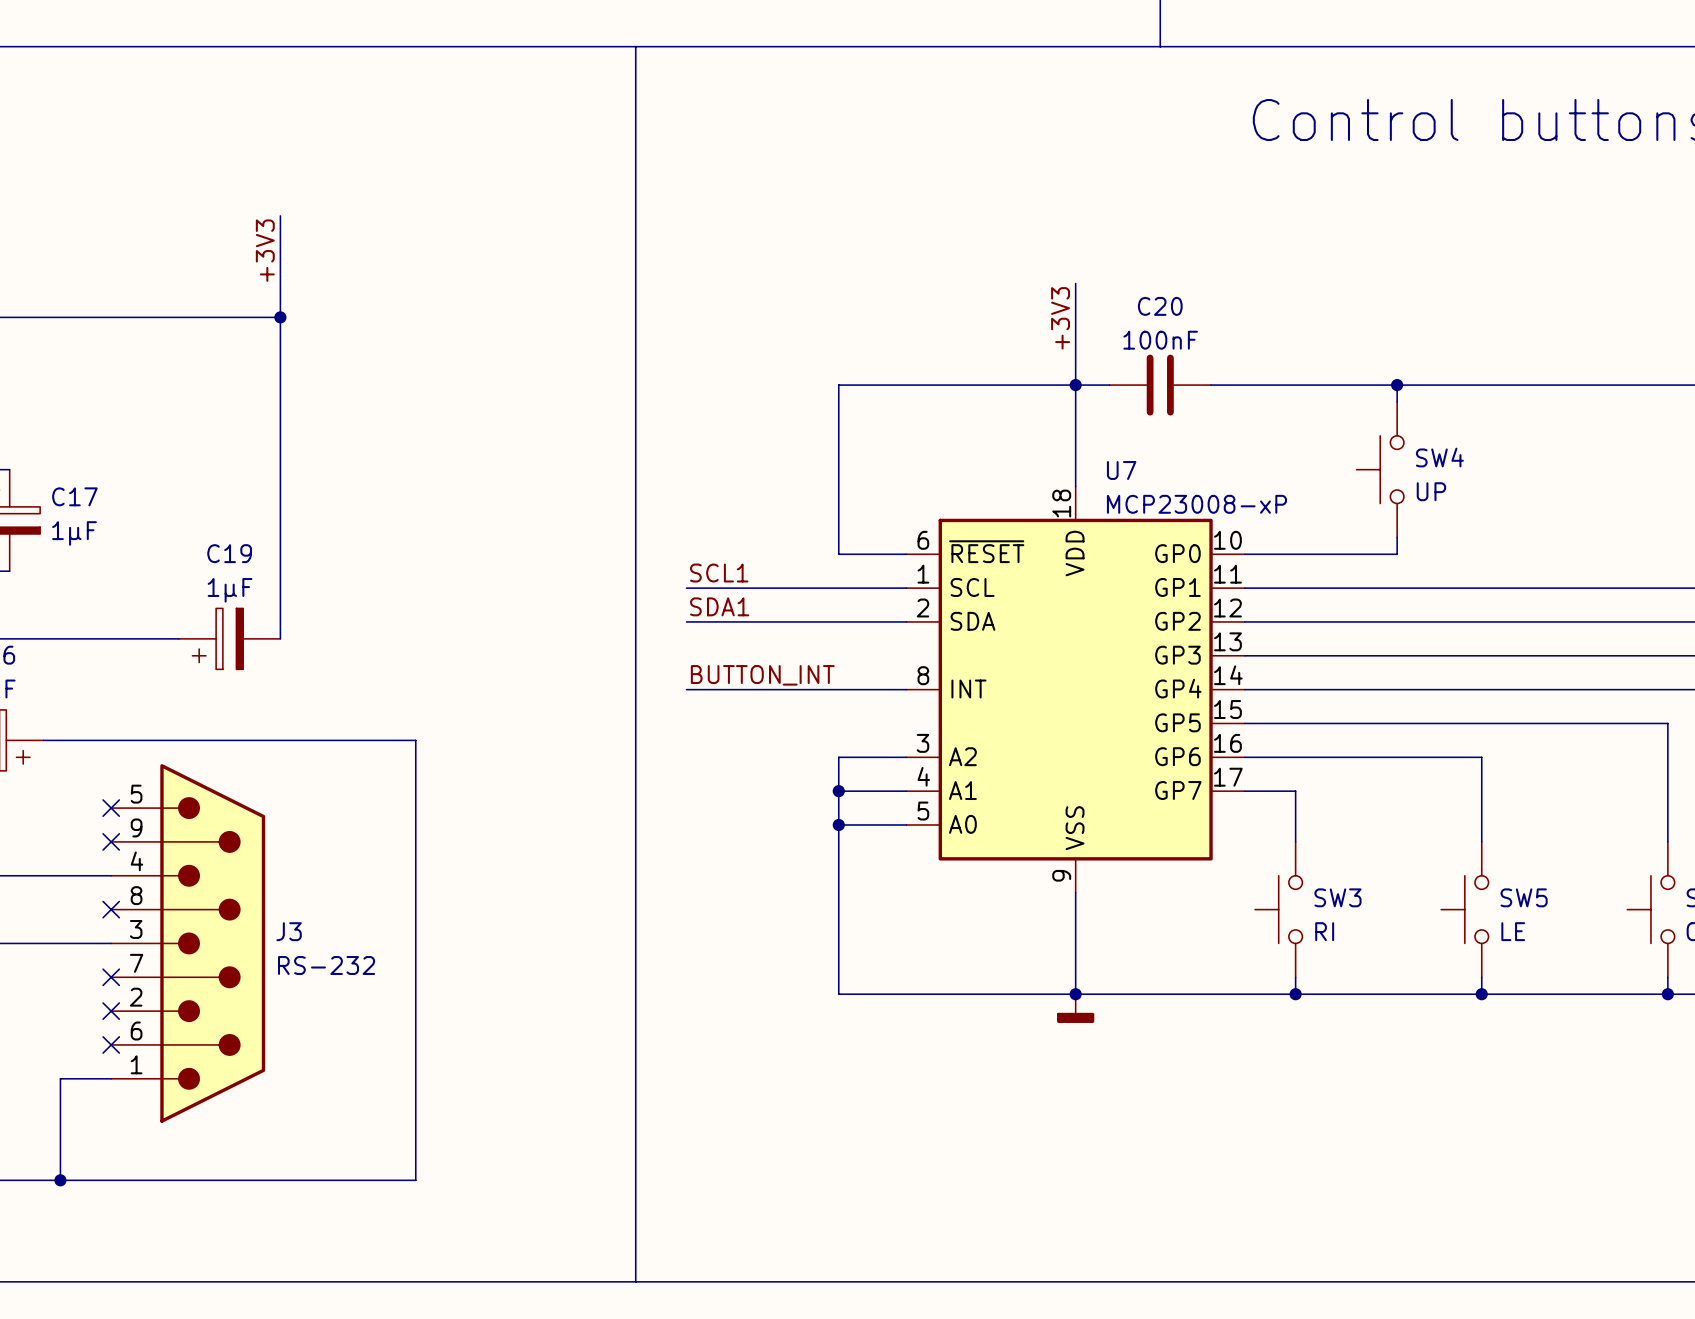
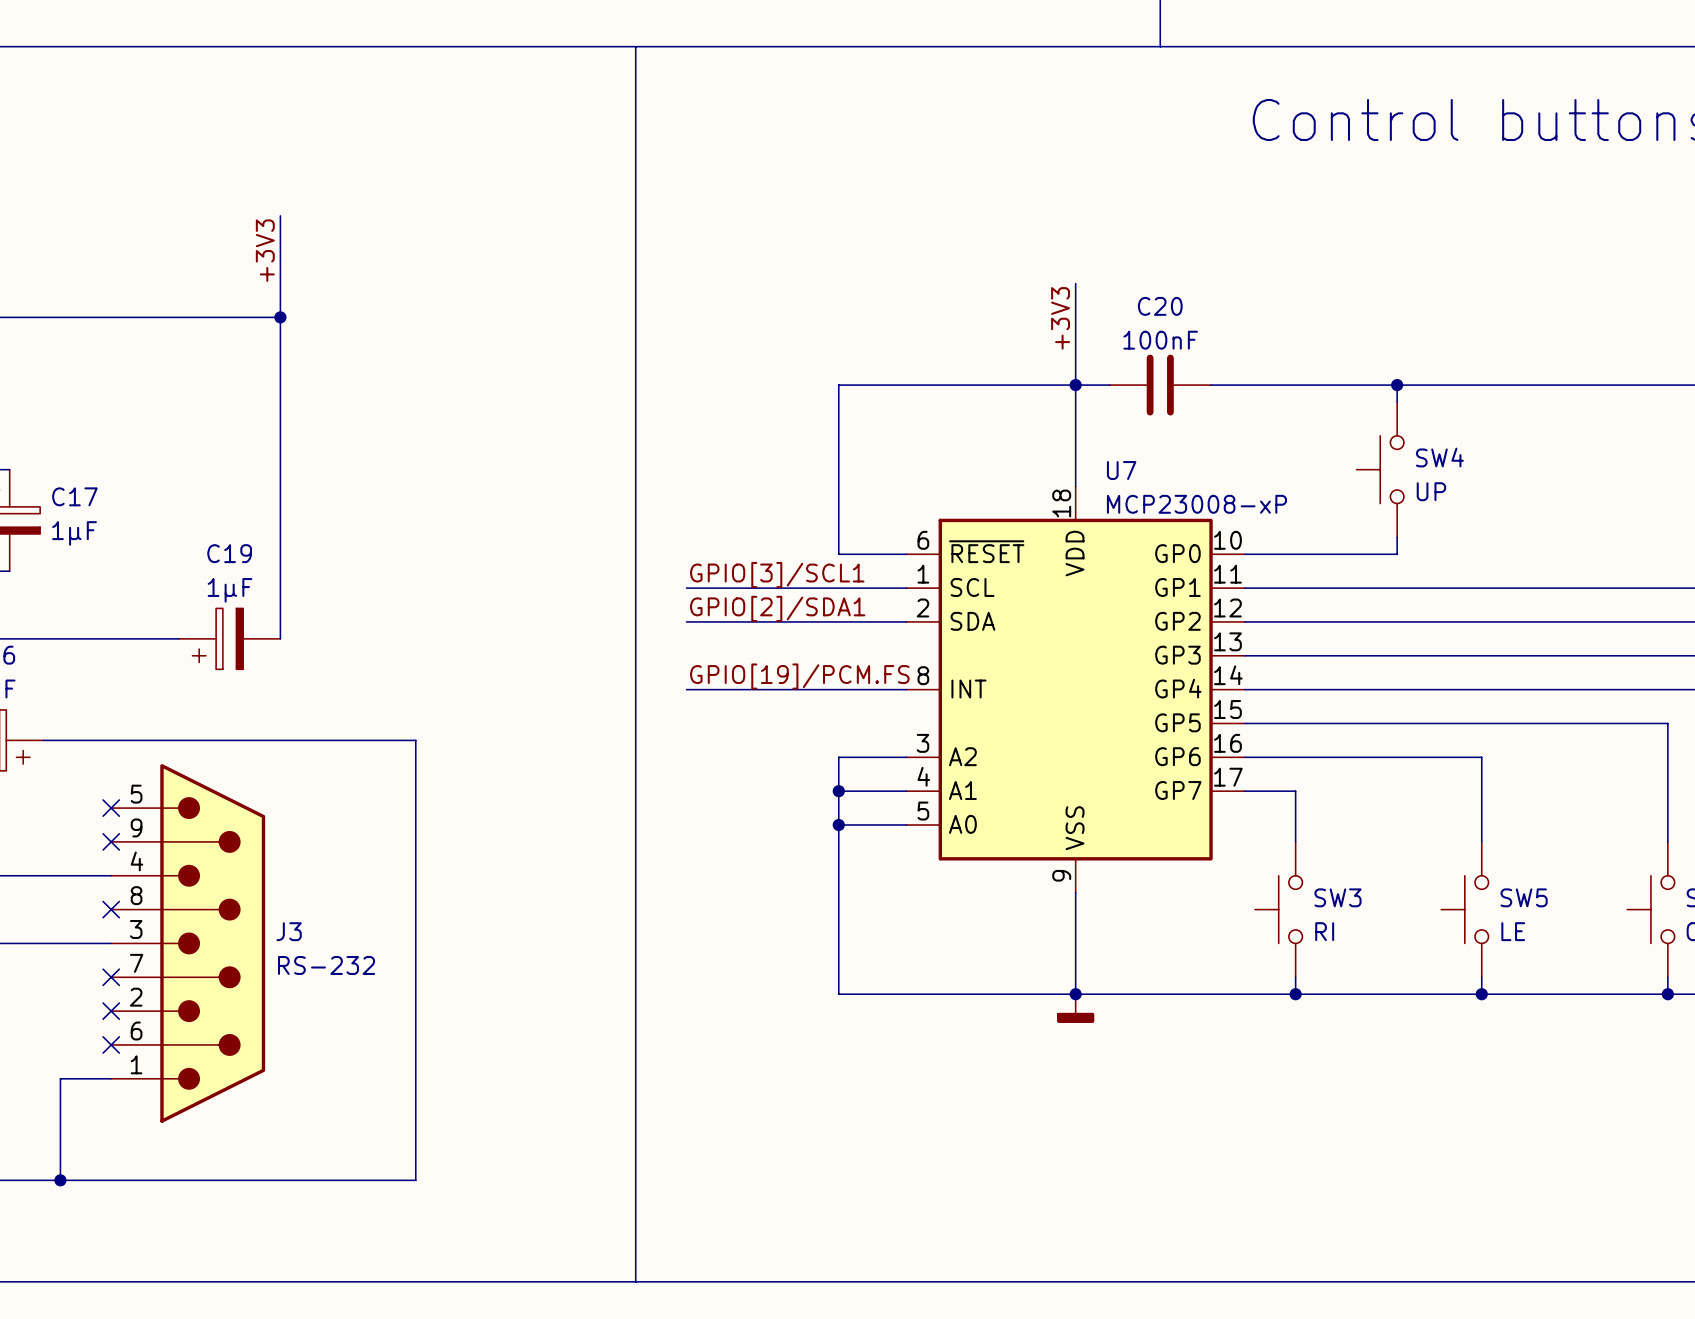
label: SCL1 (719, 573) -> GPIO[3]/SCL1 (777, 575)
label: SDA1 (719, 606) -> GPIO[2]/SDA1 (777, 608)
label: BUTTON_INT (762, 675) -> GPIO[19]/PCM.FS (799, 676)

